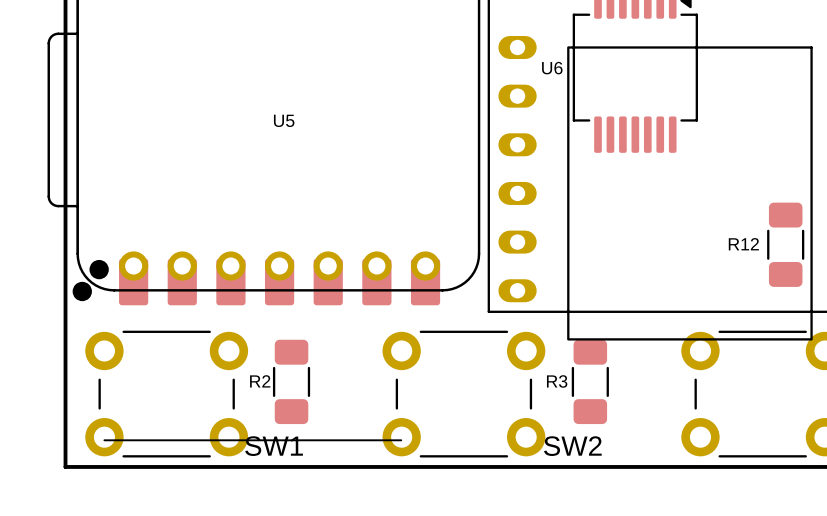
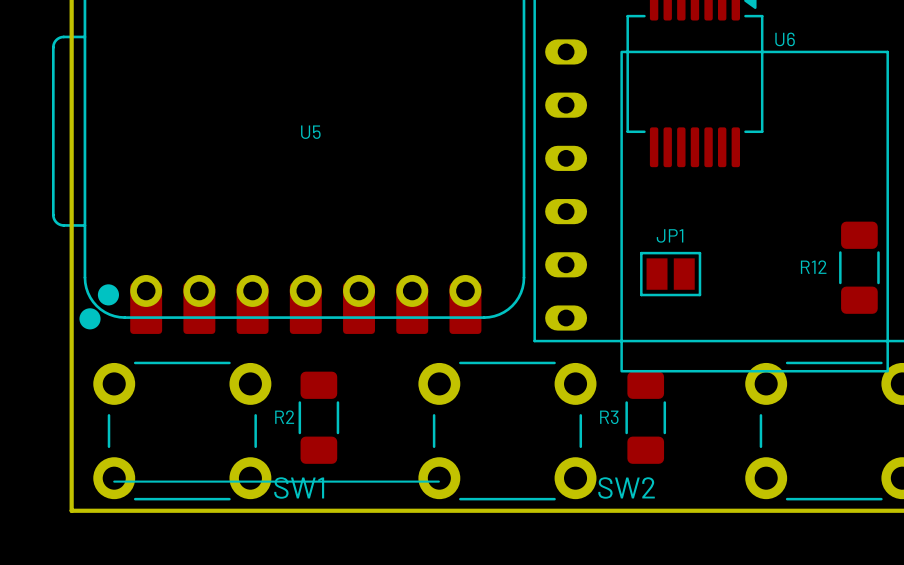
U6 name position: U6 (552, 68) -> U6 (785, 39)
JP1: none -> (670, 274)

